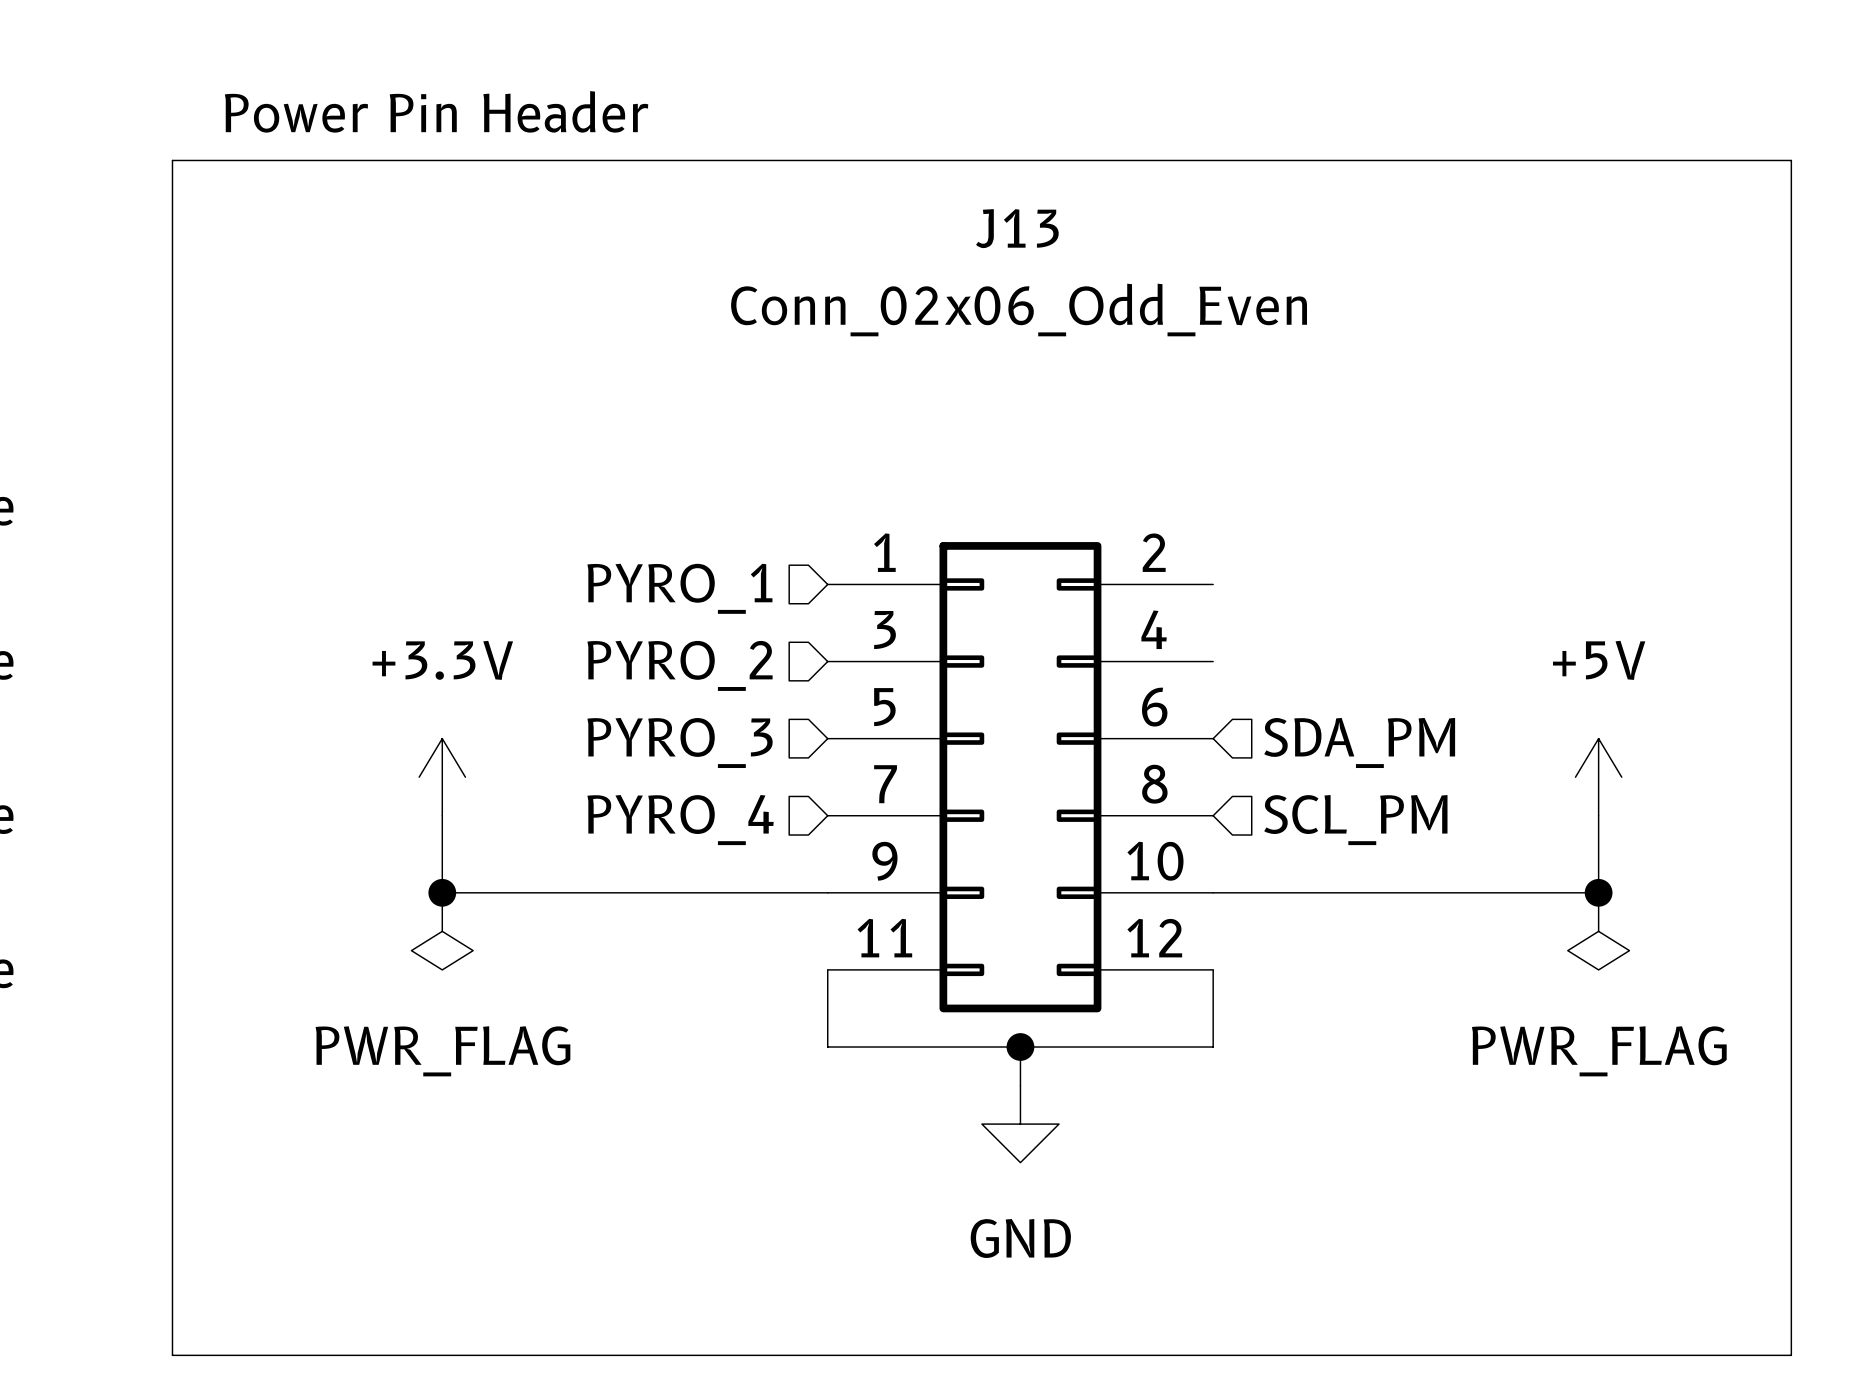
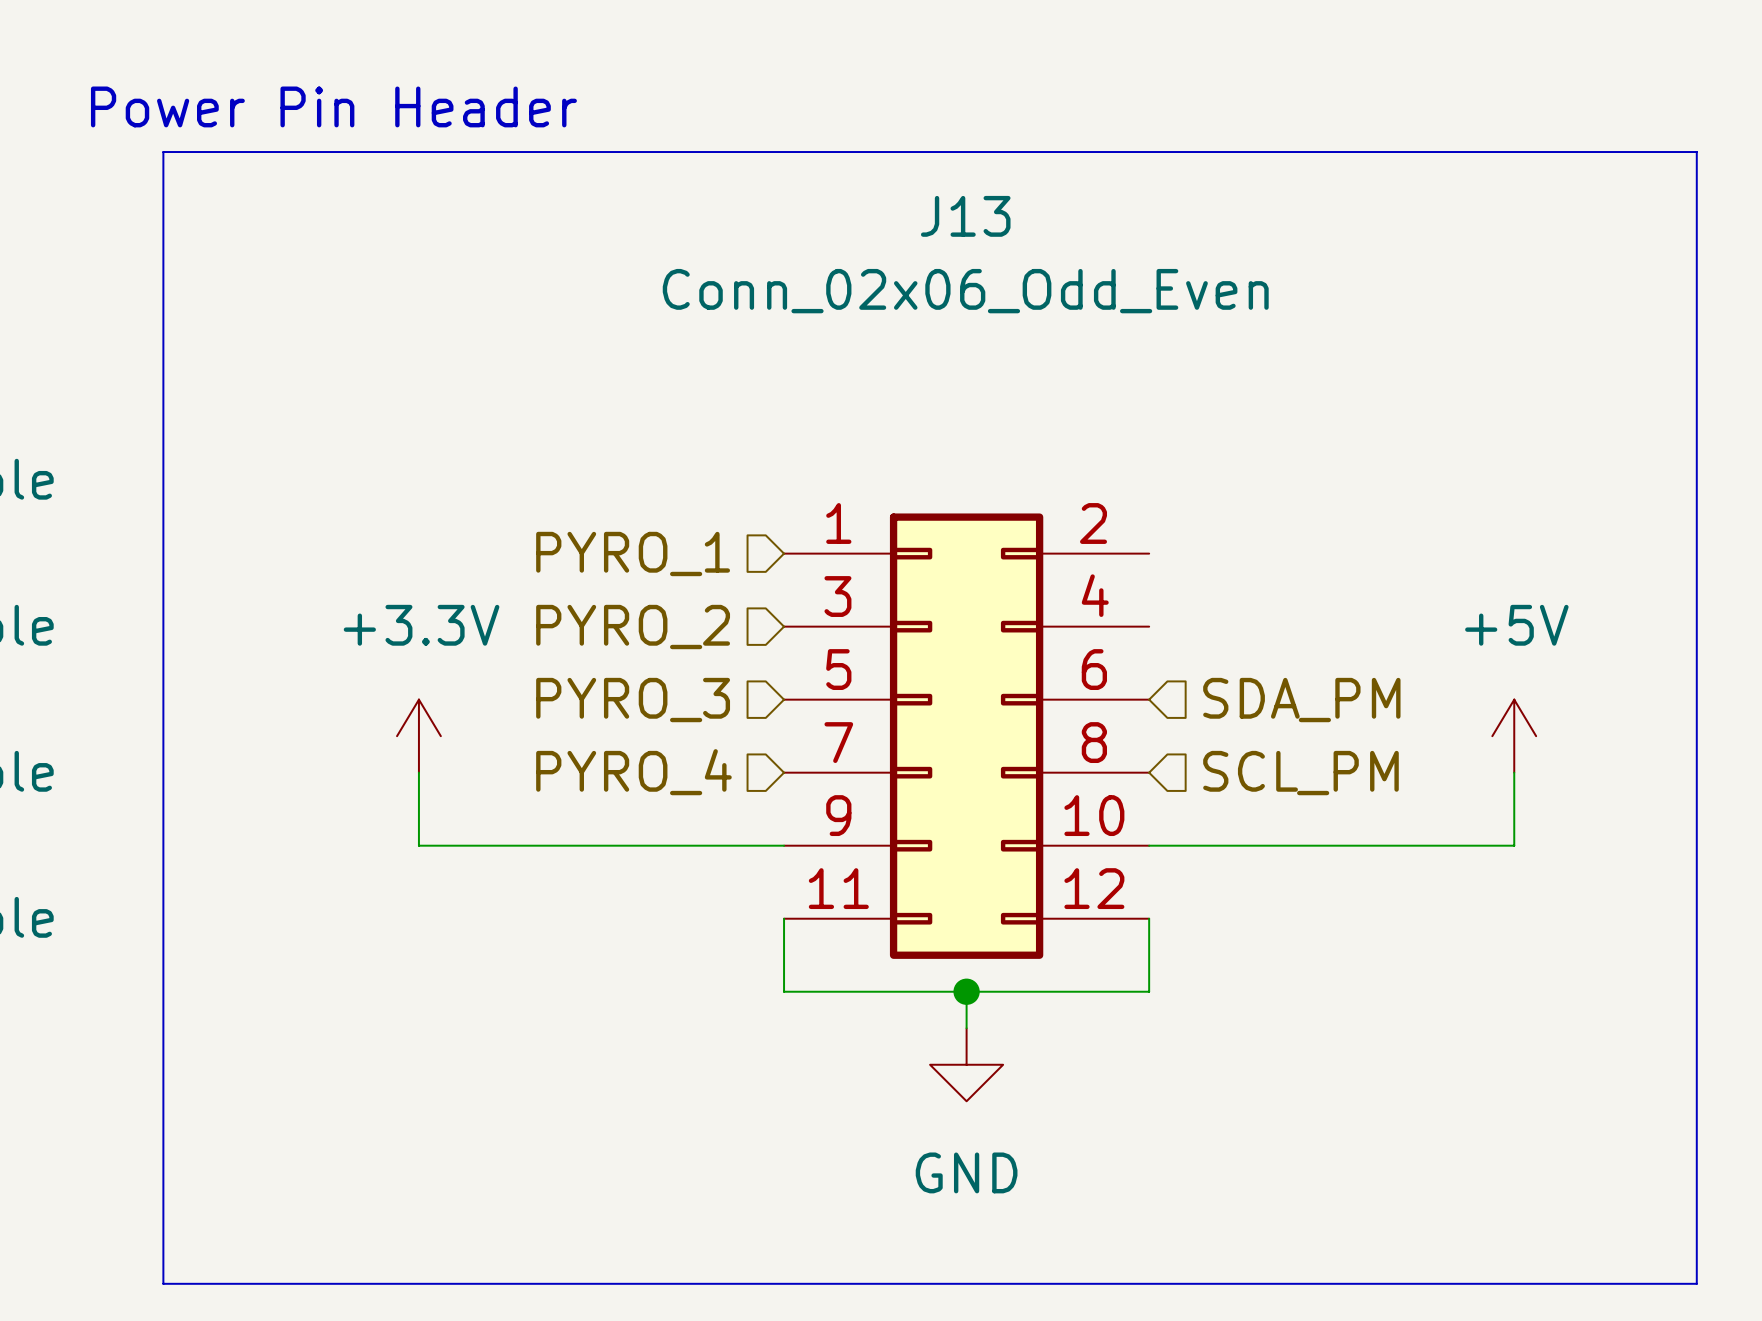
text position: Power Pin Header (436, 111) -> Power Pin Header (333, 106)
junction: (442, 892) -> none
junction: (1598, 892) -> none
power symbol: PWR_FLAG (442, 931) -> none
power symbol: PWR_FLAG (1598, 931) -> none

